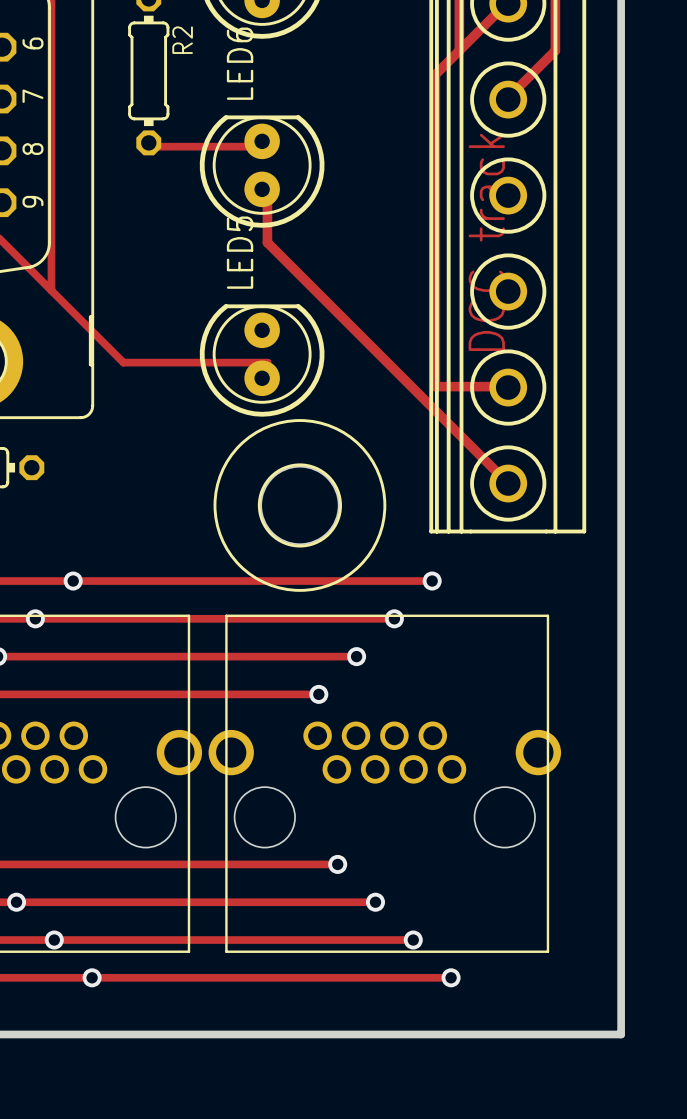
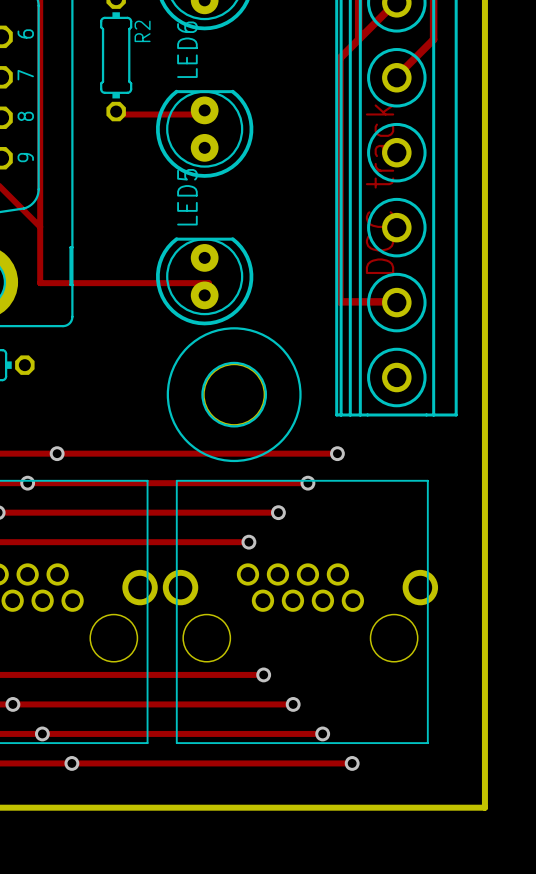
track: (262, 189) (267, 194) (267, 242) (508, 483) -> none
track: (51, 290) (123, 362) -> (40, 226) (40, 283) (96, 283)

